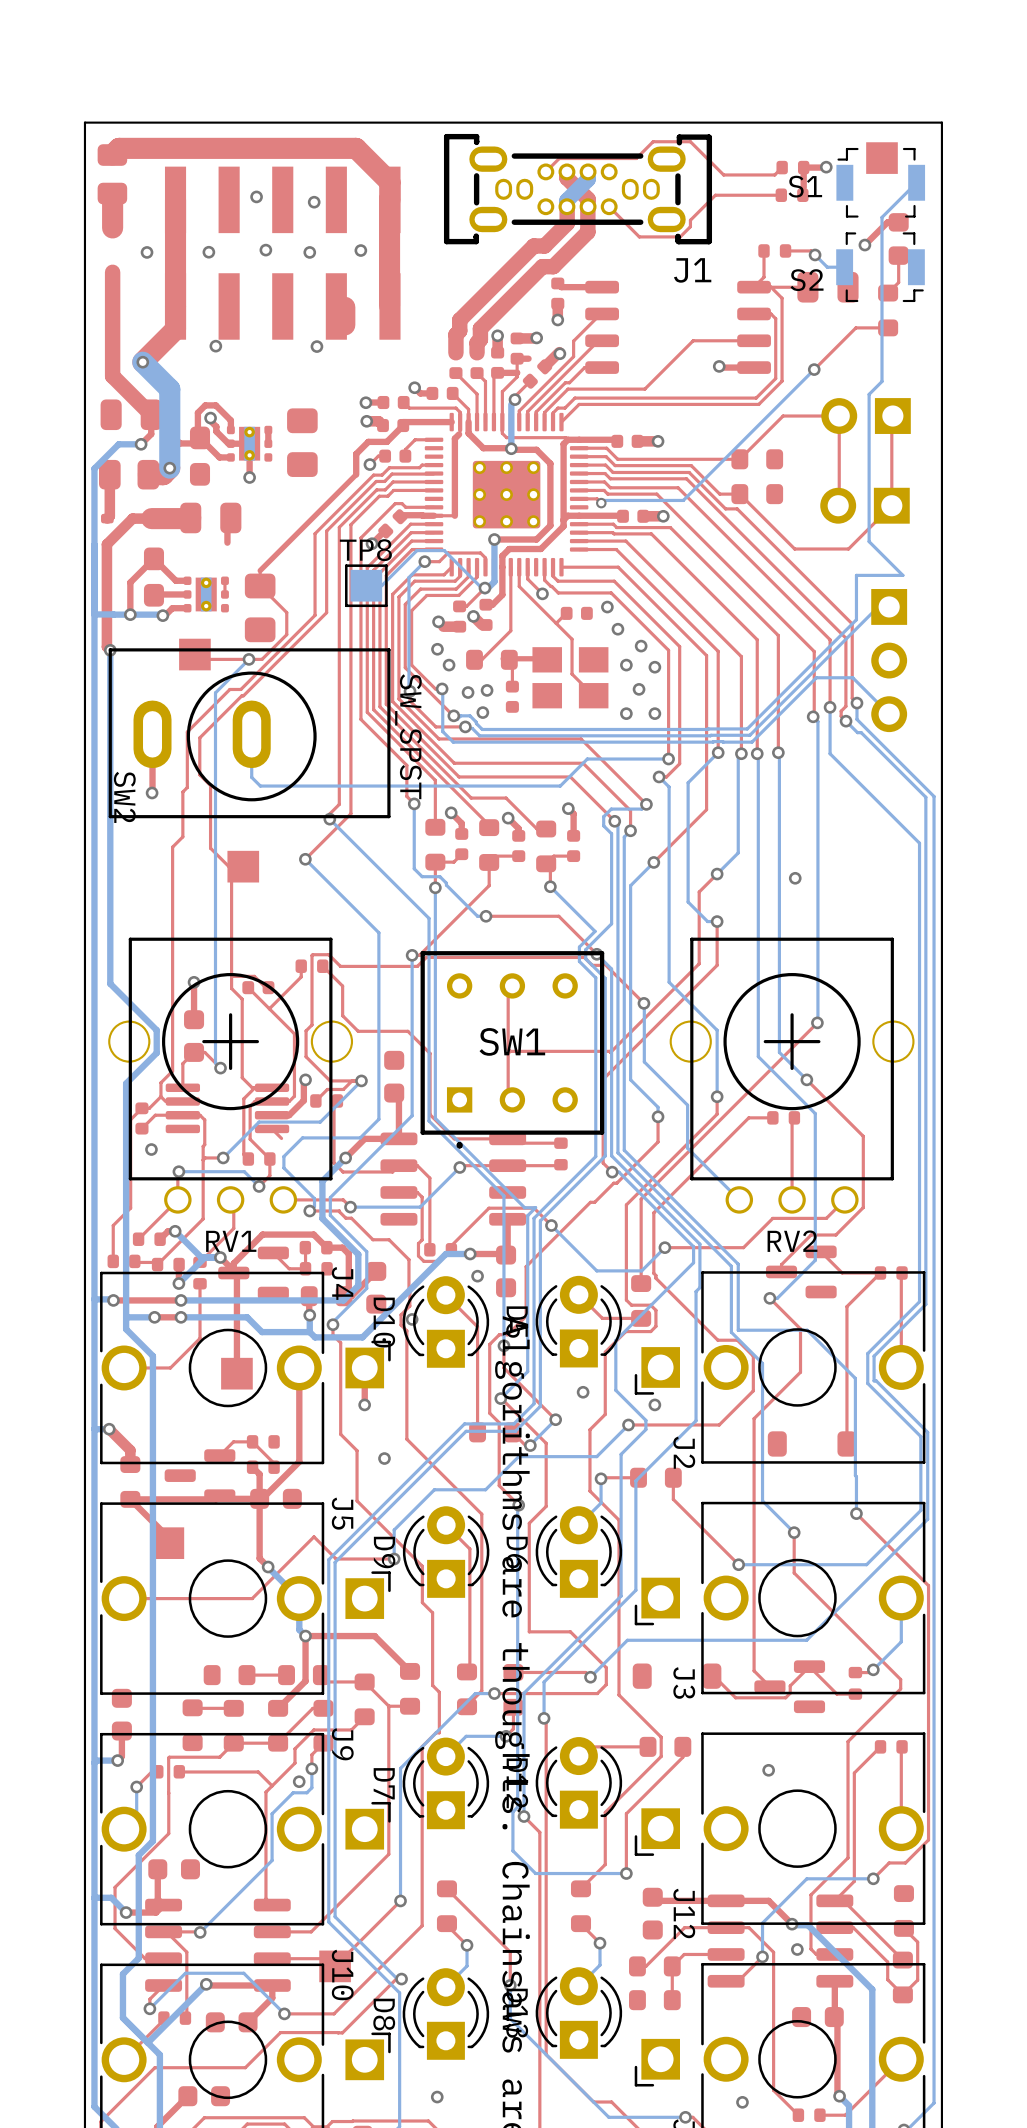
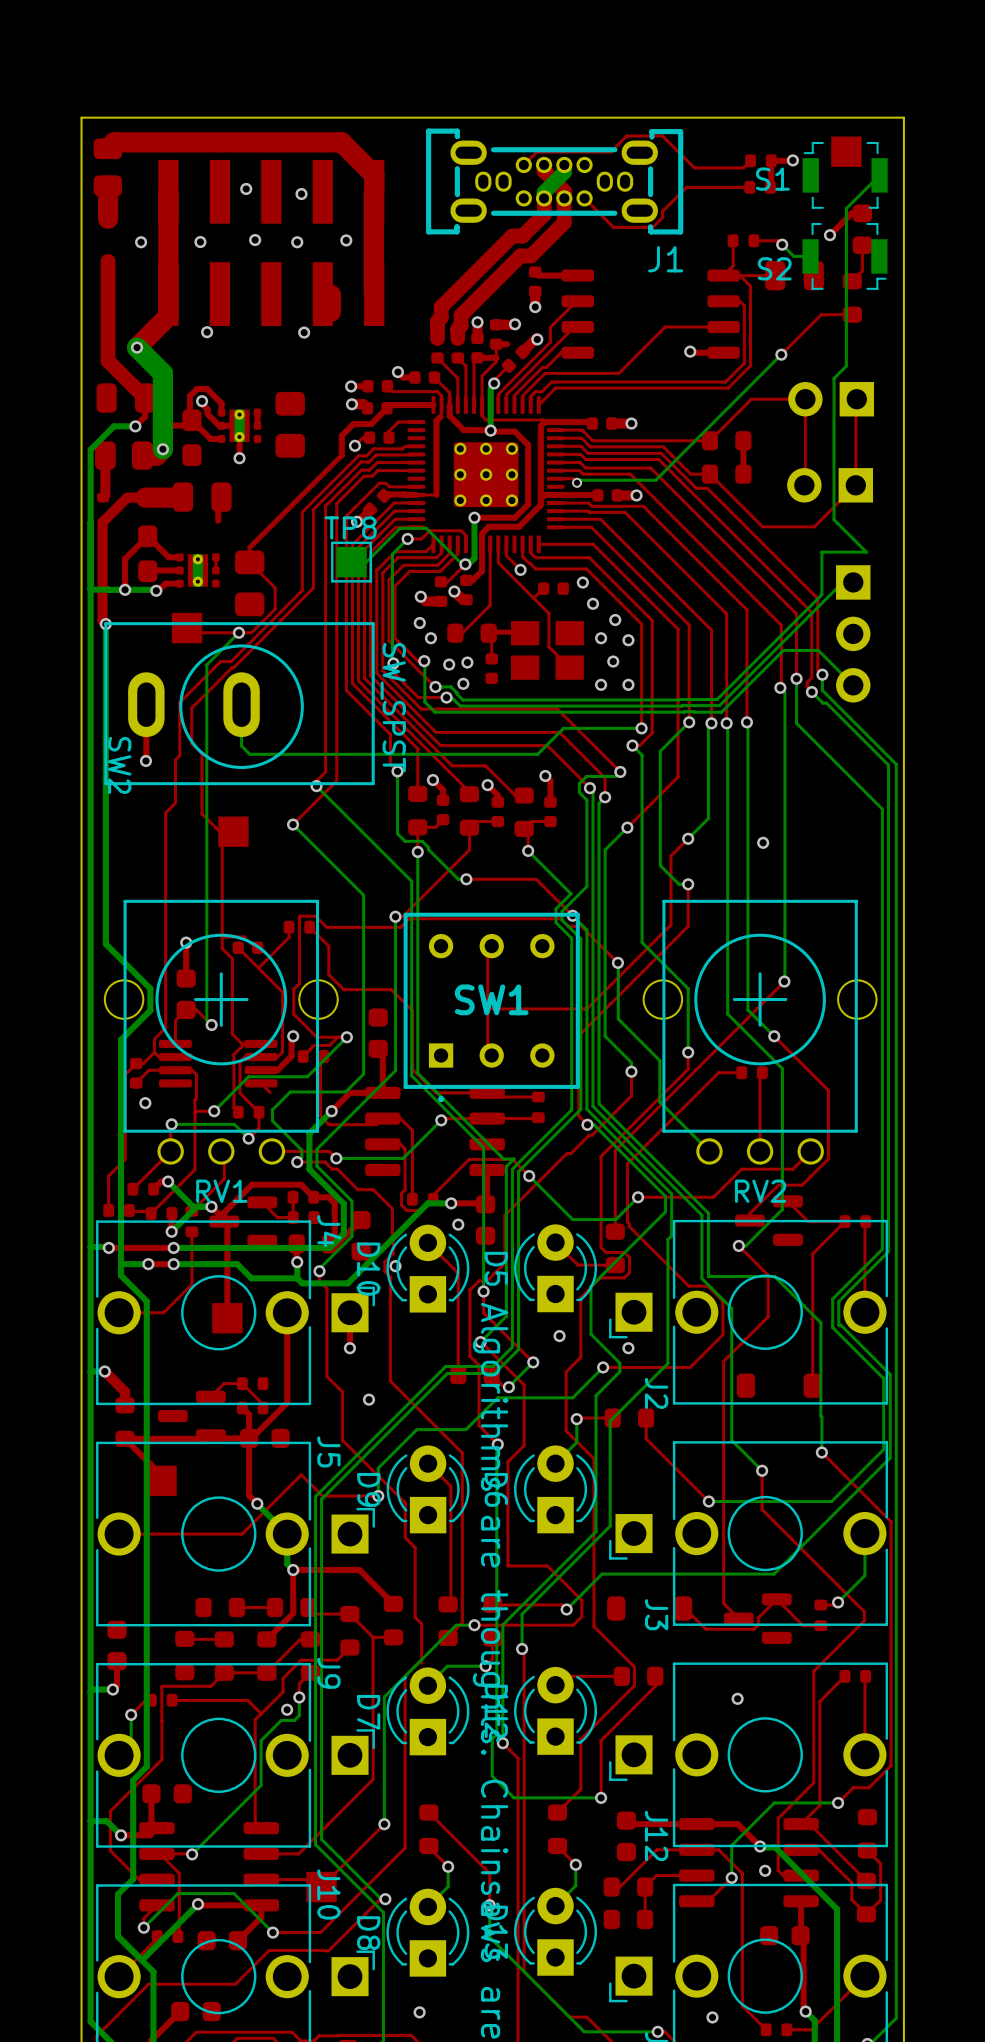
top track: none -> (743, 440) (743, 469)

